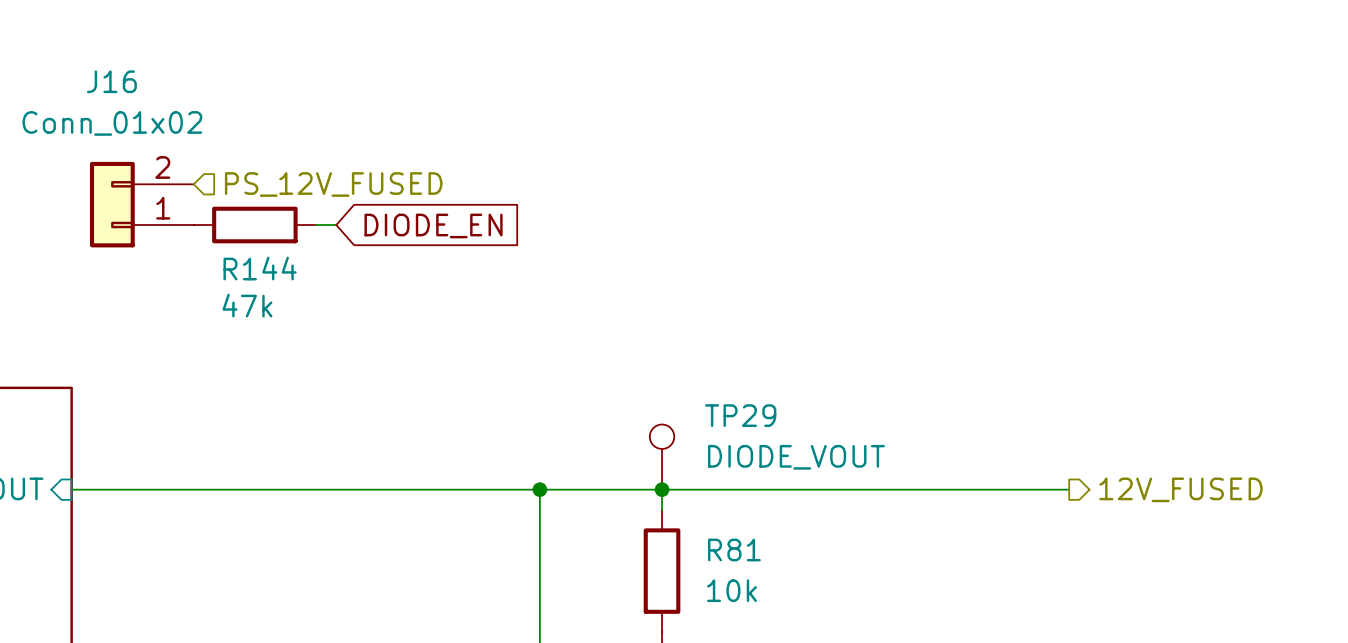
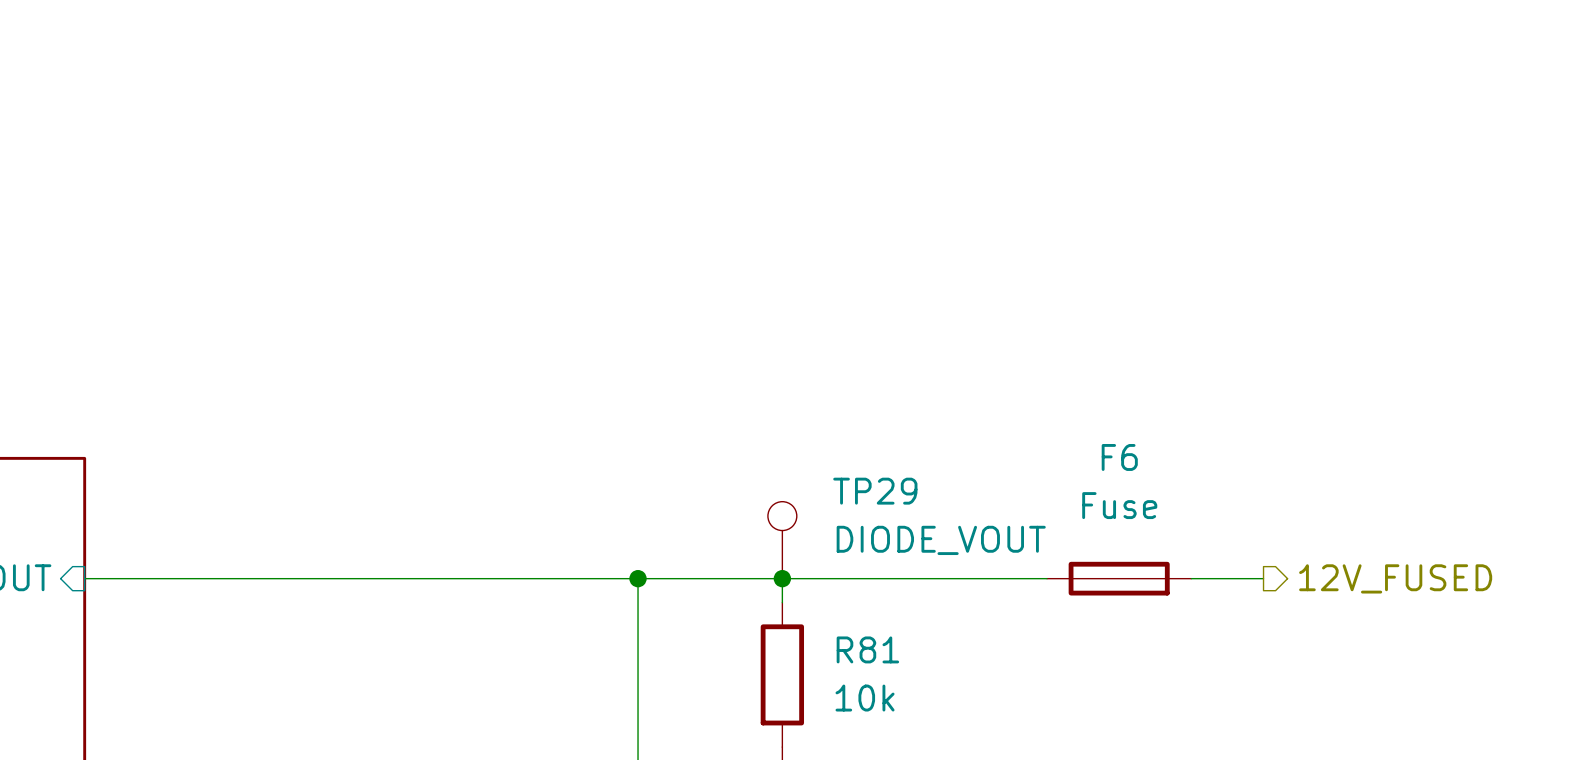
hierarchical label: PS_12V_FUSED (333, 184) -> none
J16: Conn_01x02 (141, 204) -> none
R144: 47k (254, 225) -> none
wire: (315, 225) (336, 225) -> none
global label: DIODE_EN (433, 225) -> none
F6: none -> Fuse (1119, 578)

